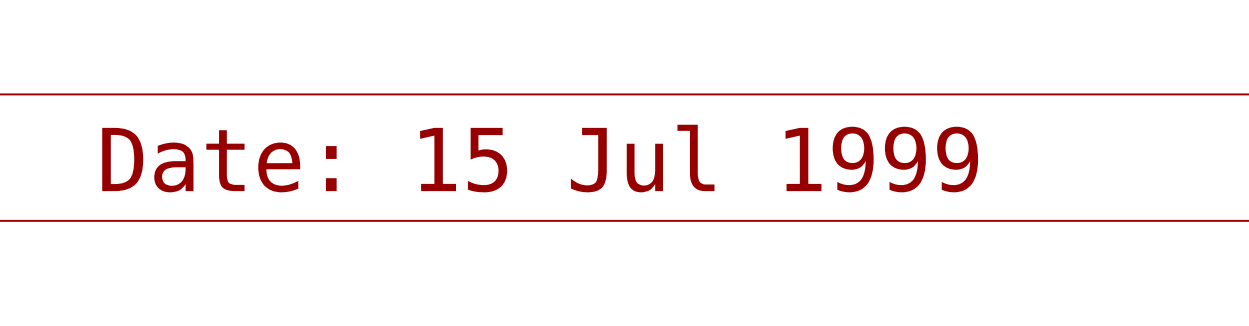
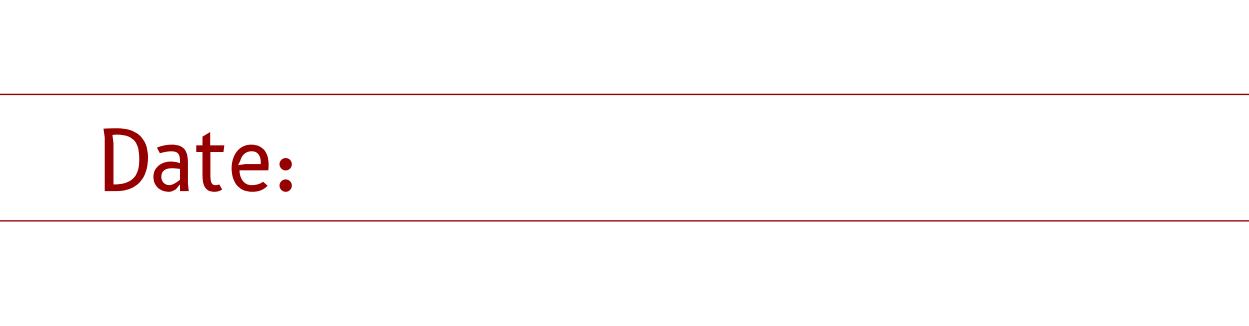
title block: Date: 15 Jul 1999 (540, 158) -> Date: (197, 160)

